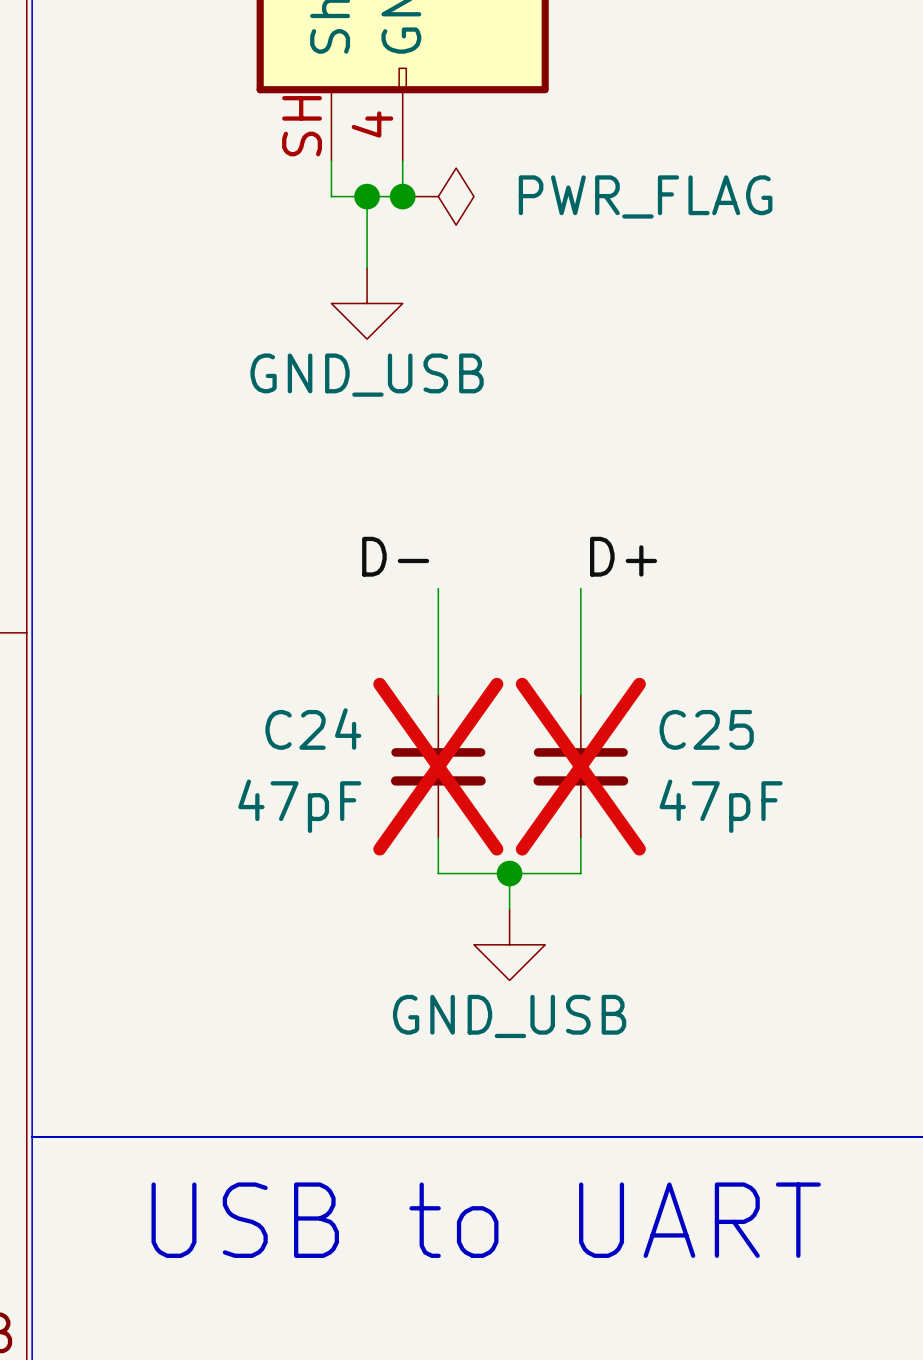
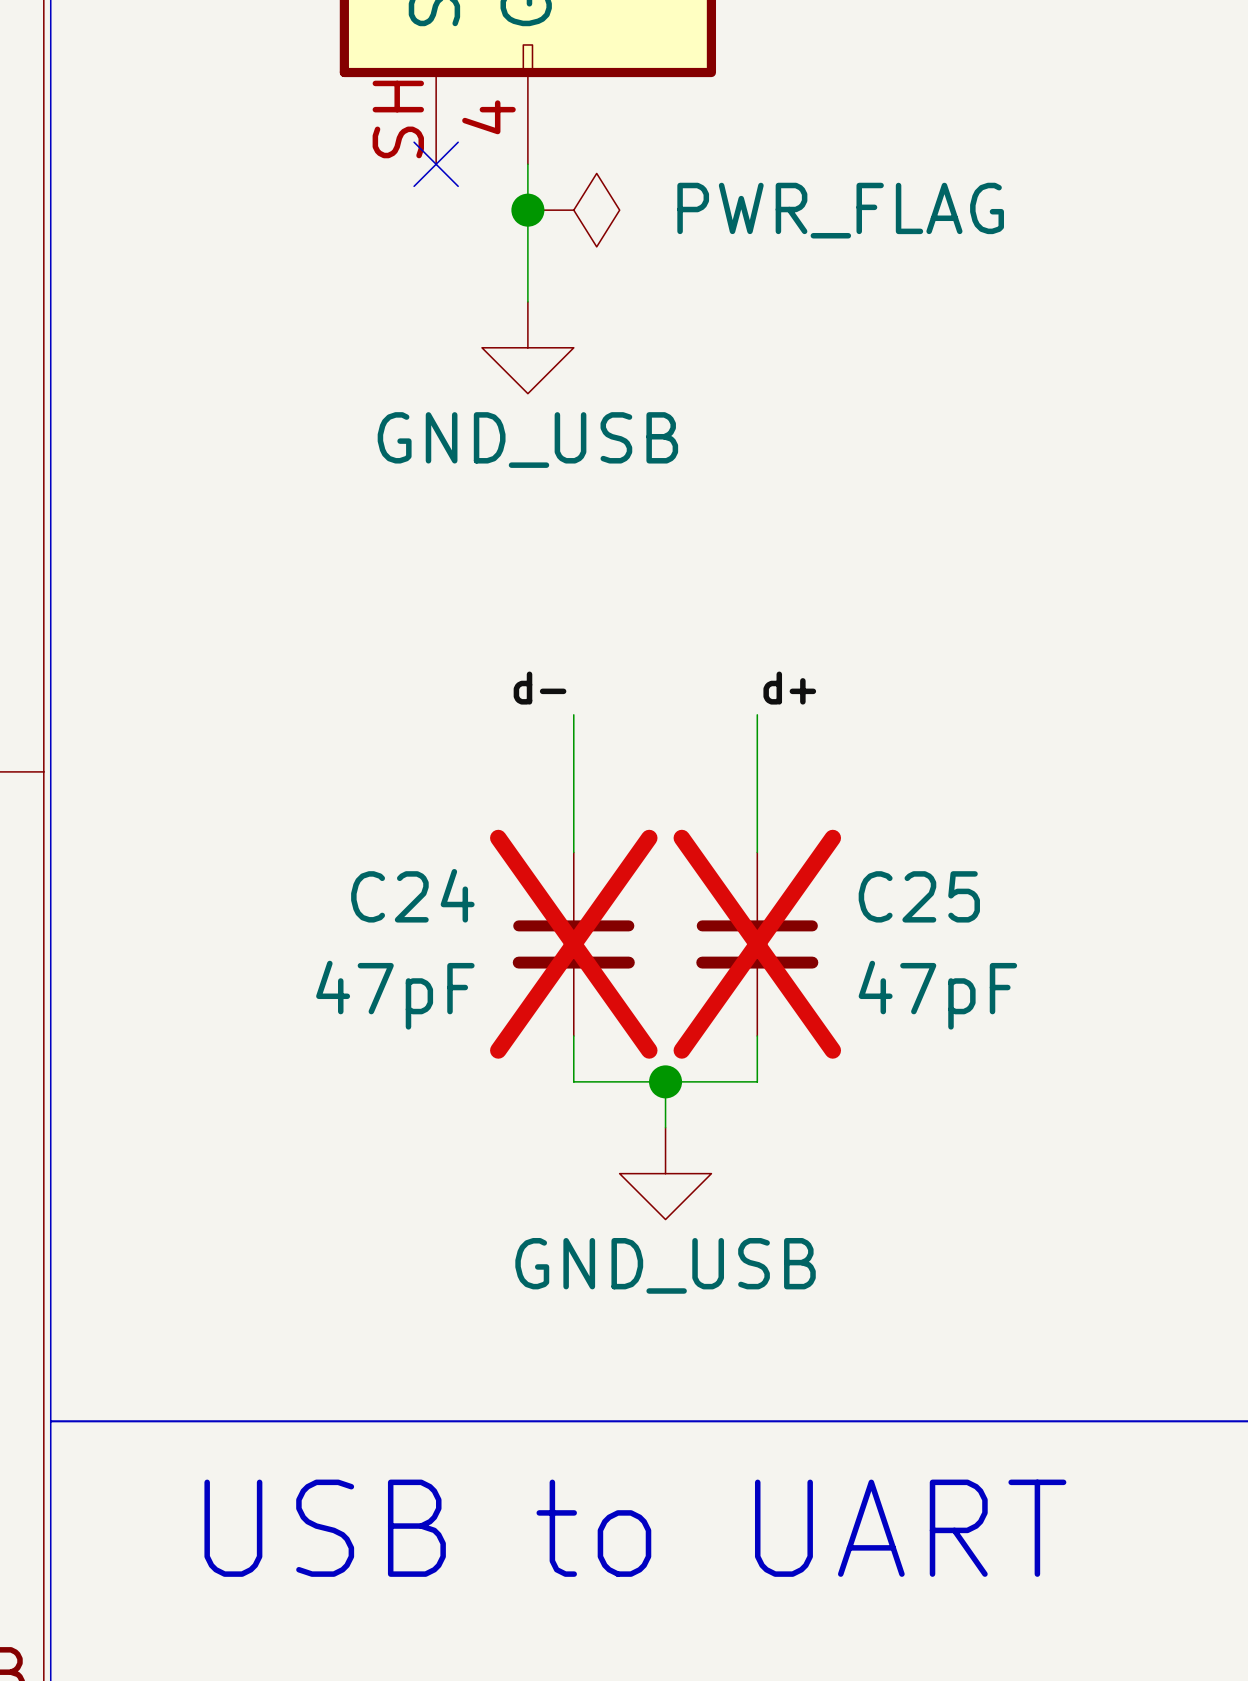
wire: (331, 160) (331, 196) (402, 196) -> (527, 301) (527, 210)
no-connect mark: none -> (436, 164)
wire: (367, 196) (367, 267) -> none
junction: (367, 196) -> none
power symbol position: GND_USB (367, 303) -> GND_USB (527, 347)
label: D- (395, 556) -> d- (540, 688)
label: D+ (623, 556) -> d+ (789, 688)

